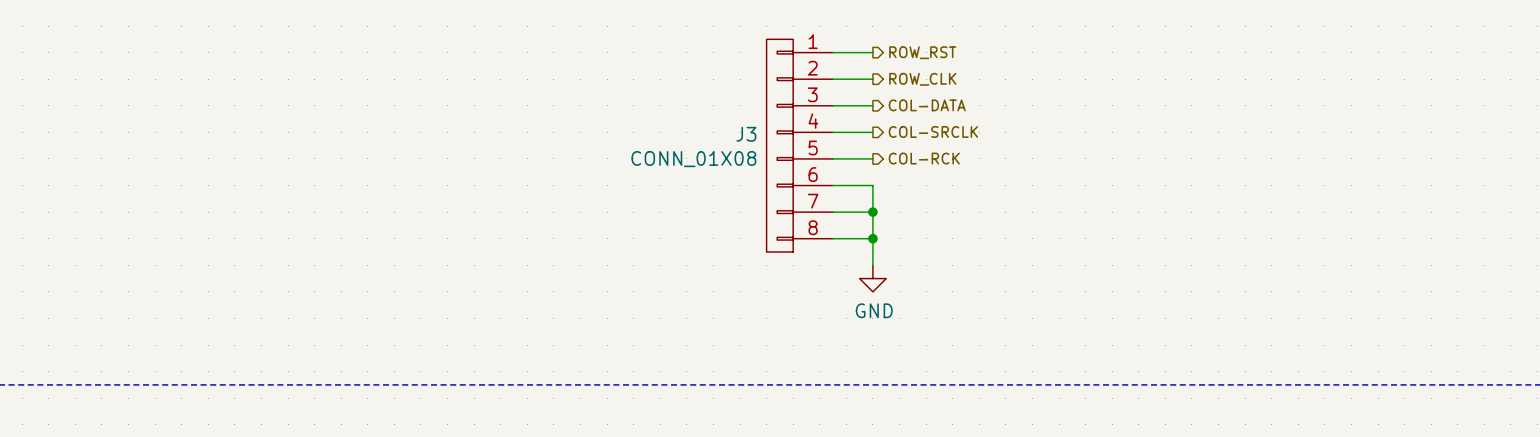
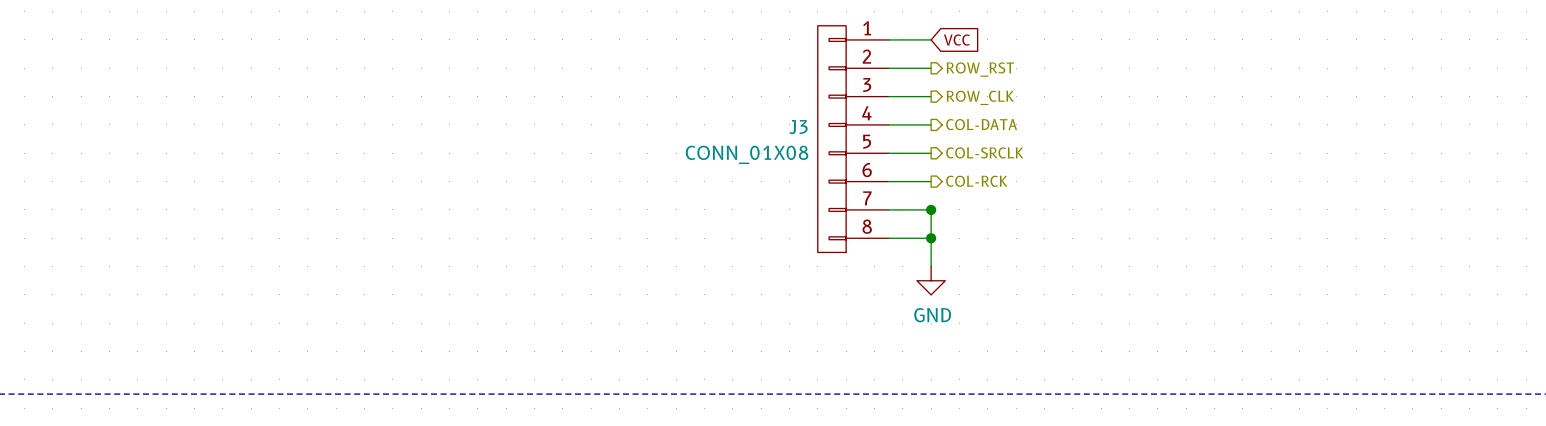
global label: none -> VCC (956, 40)
hierarchical label: ROW_RST (922, 52) -> none
hierarchical label: ROW_CLK (922, 79) -> ROW_RST (980, 69)
hierarchical label: COL-DATA (927, 105) -> ROW_CLK (980, 97)
hierarchical label: COL-SRCLK (933, 131) -> COL-DATA (981, 124)
hierarchical label: COL-RCK (924, 158) -> COL-SRCLK (984, 152)
wire: (872, 185) (872, 212) -> none
hierarchical label: none -> COL-RCK (976, 181)

